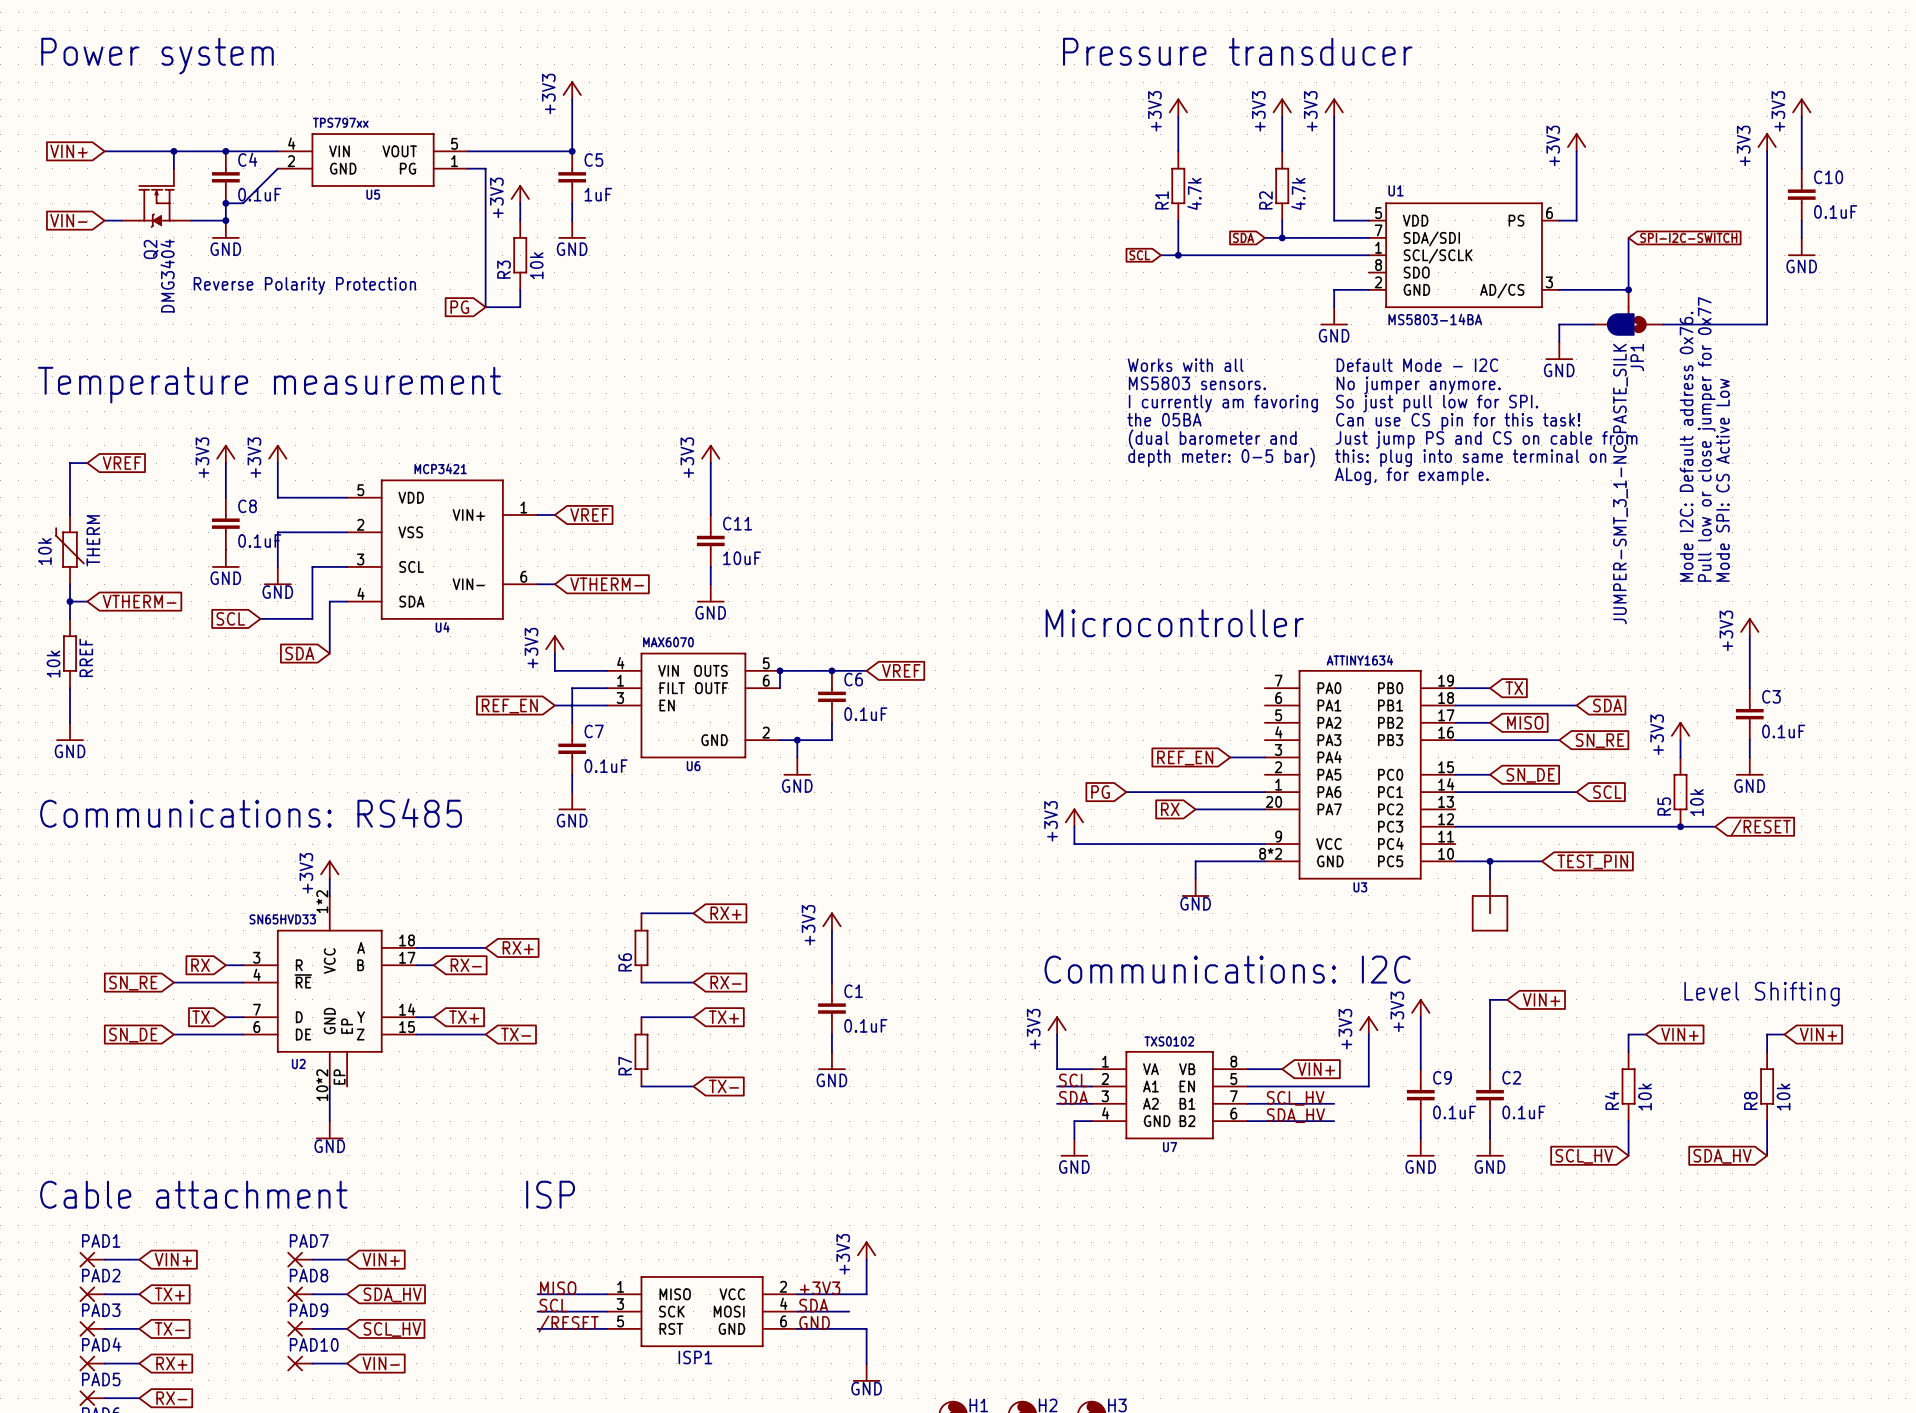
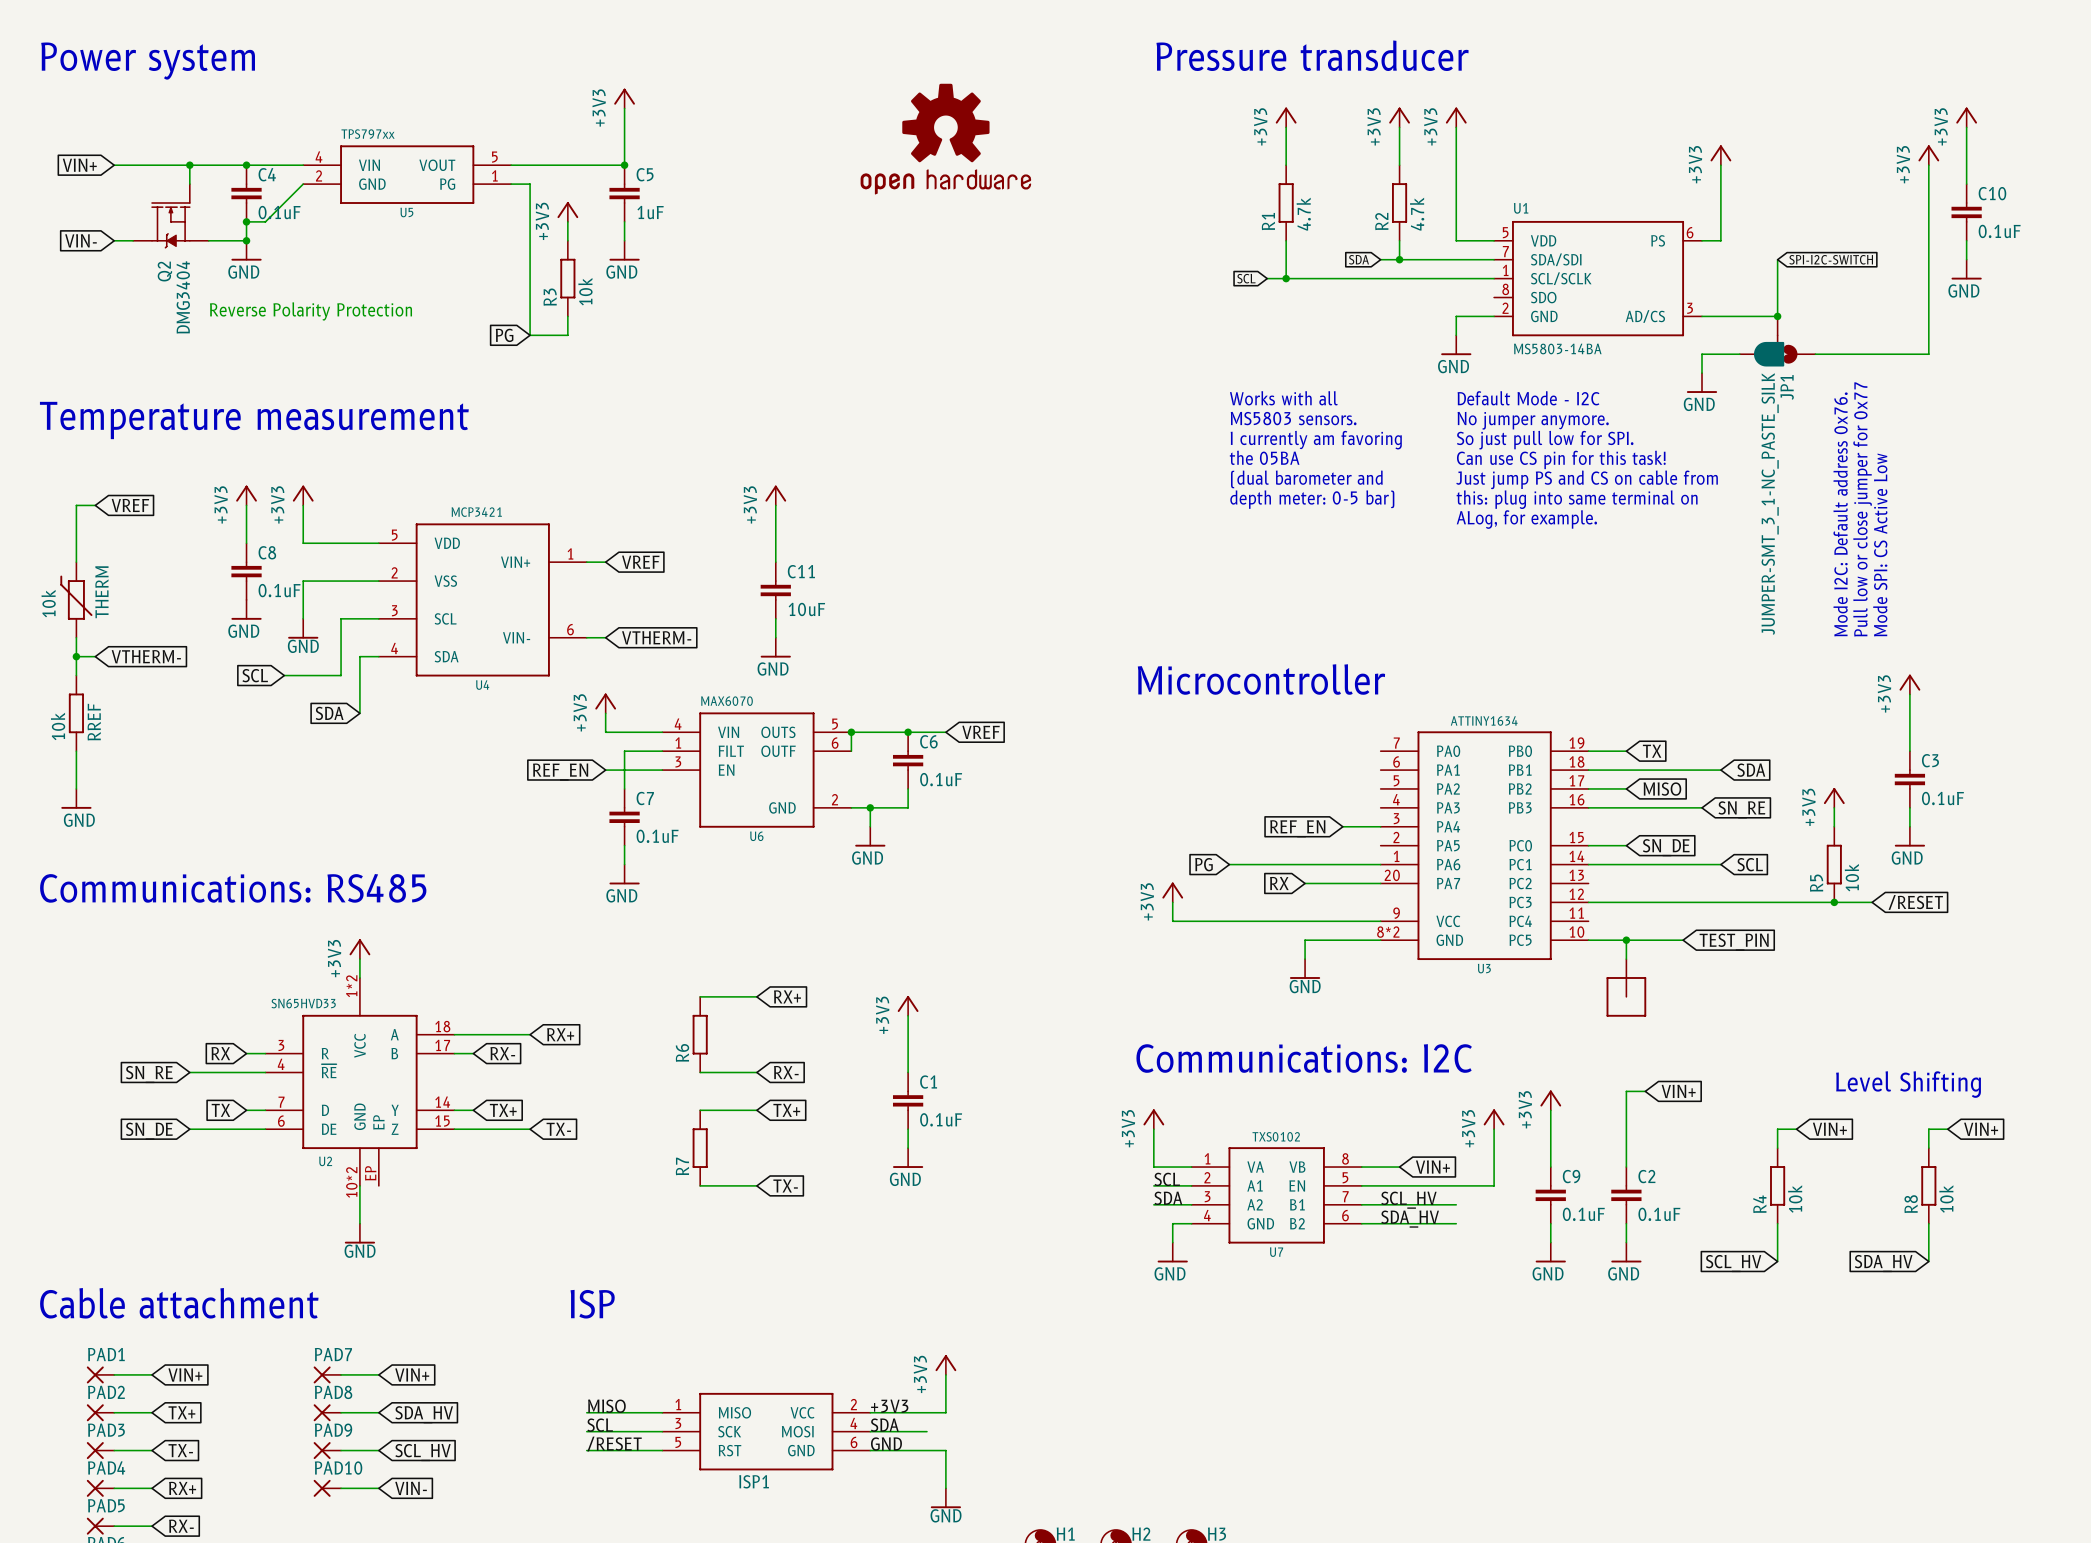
part: none -> (945, 139)

